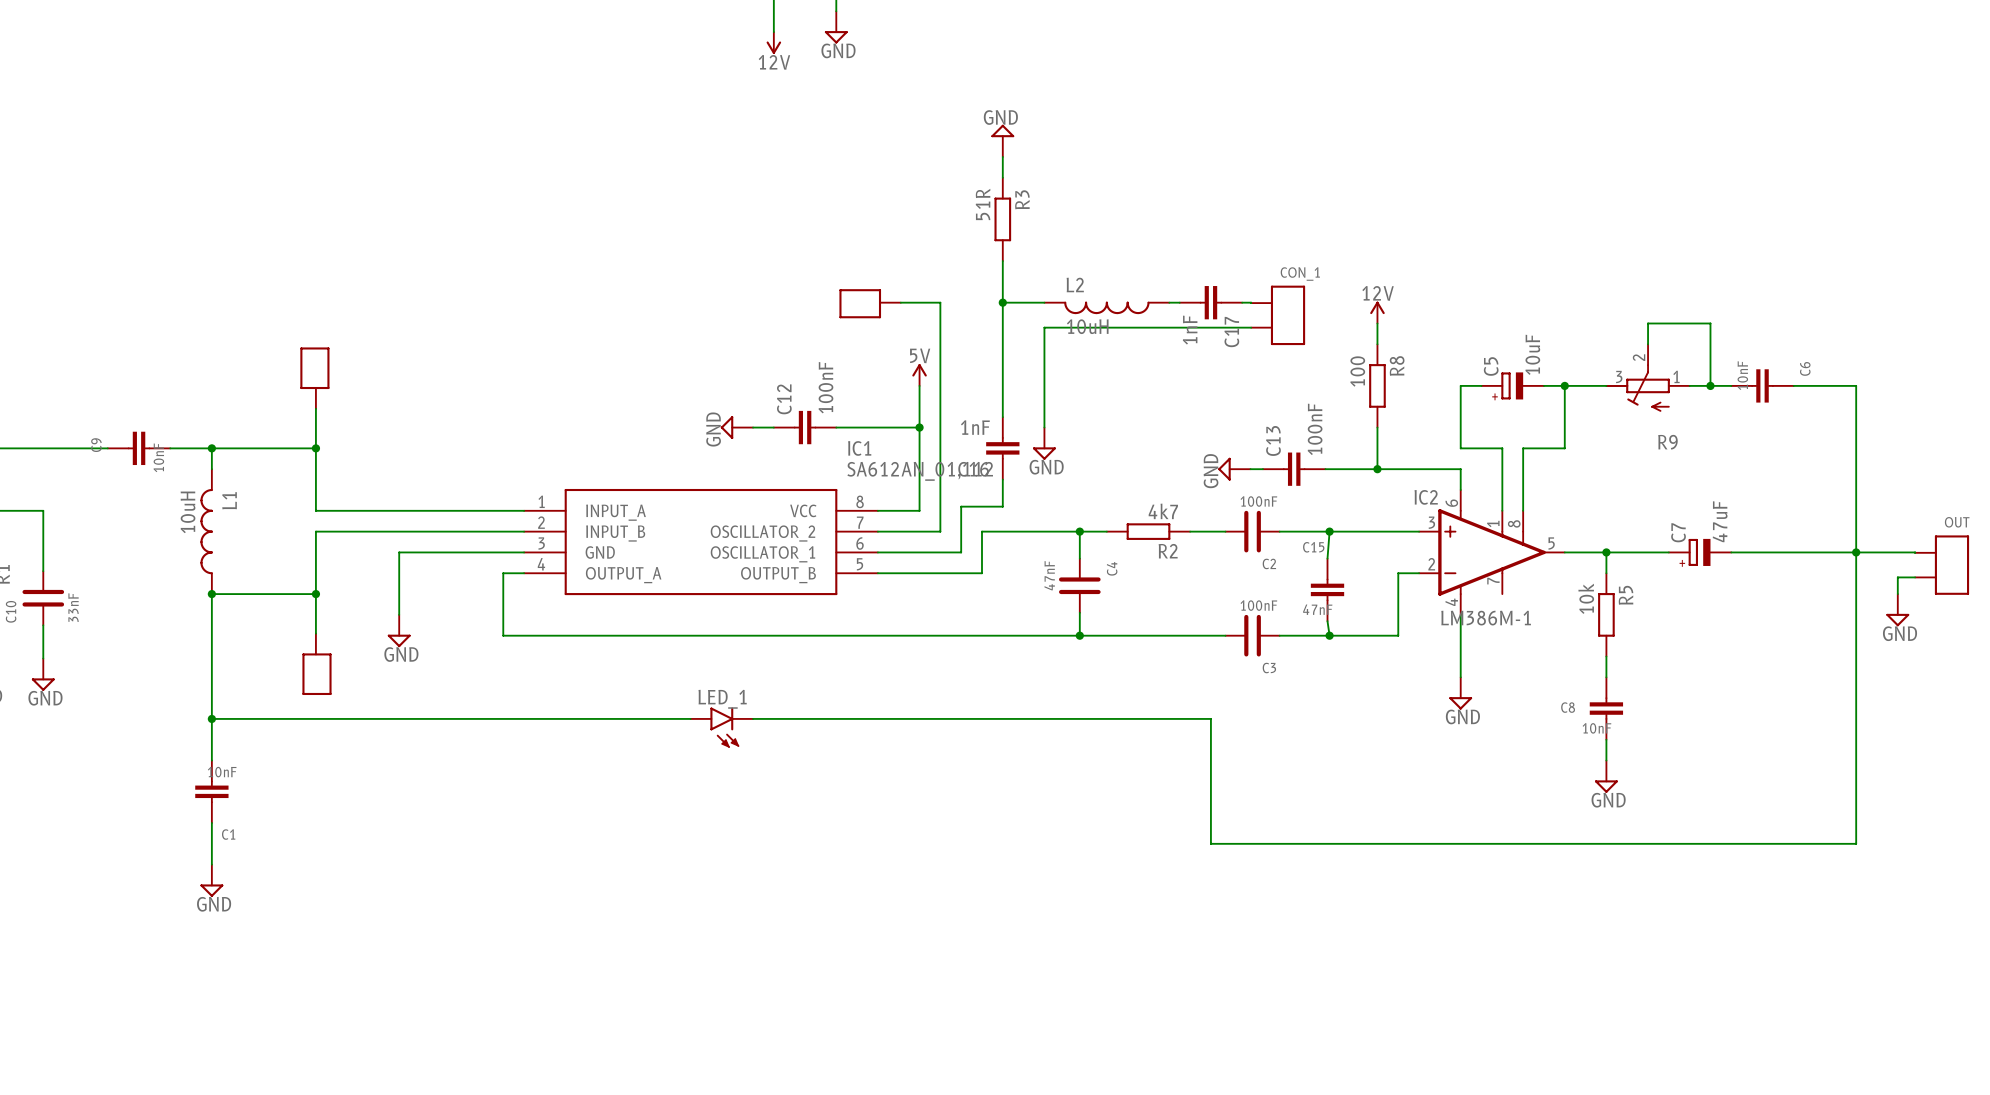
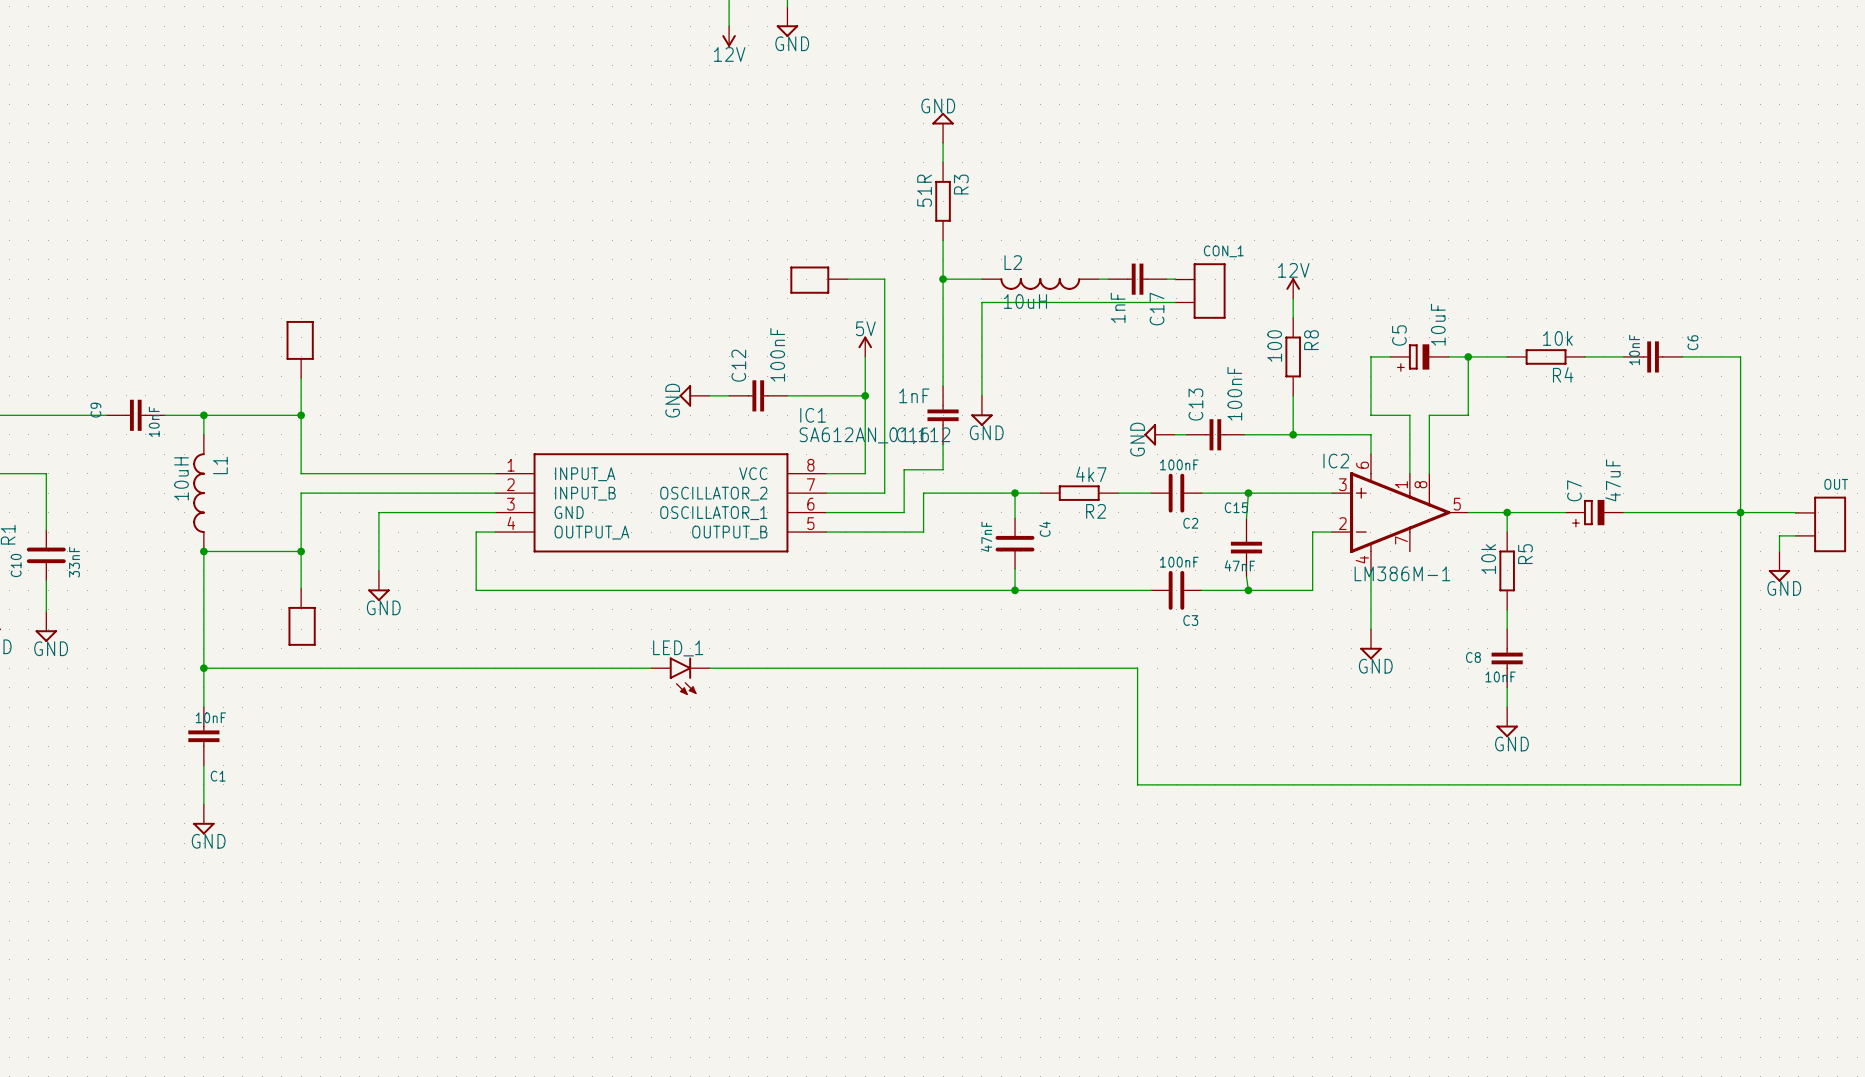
wire: (1648, 344) (1648, 323) (1710, 323) (1710, 385) -> none
R9: (1647, 377) -> none
R4: none -> 10k (1546, 356)
junction: (1710, 385) -> none

